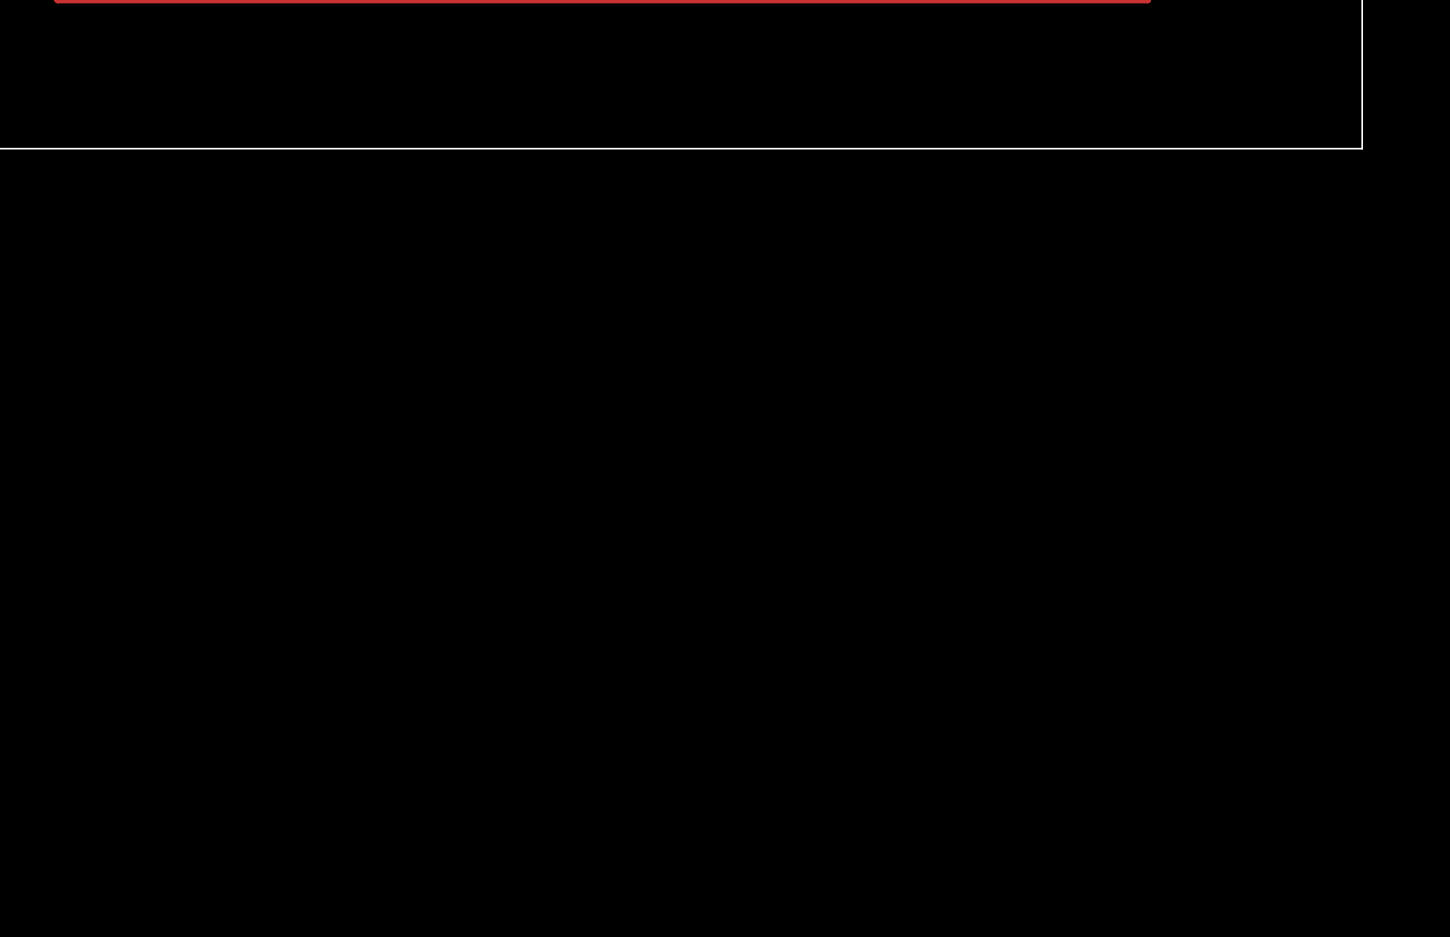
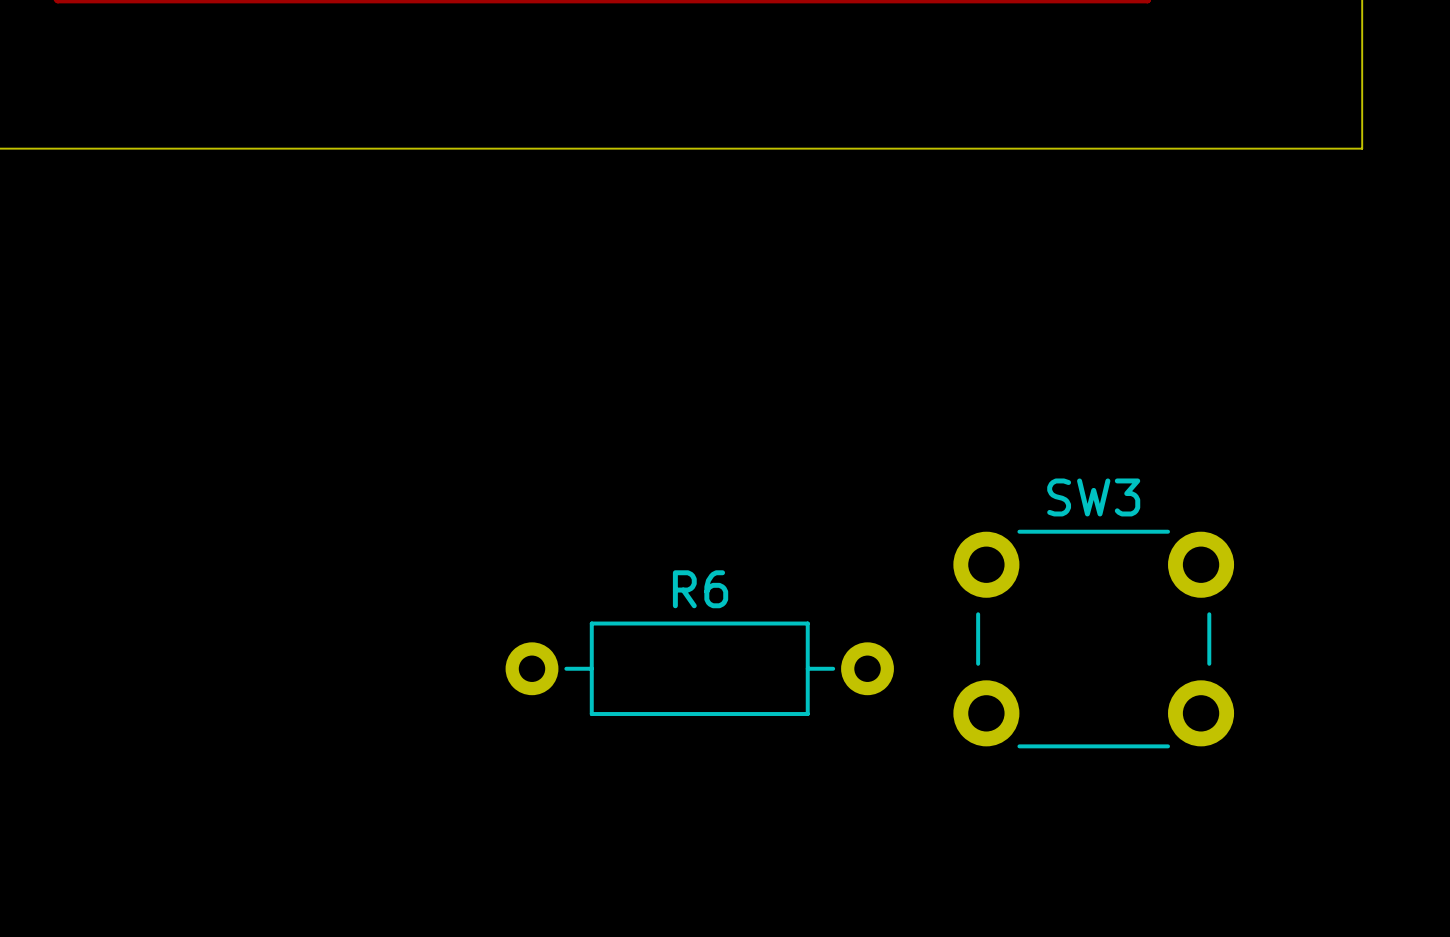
SW3: none -> (1093, 639)
R6: none -> (699, 668)

